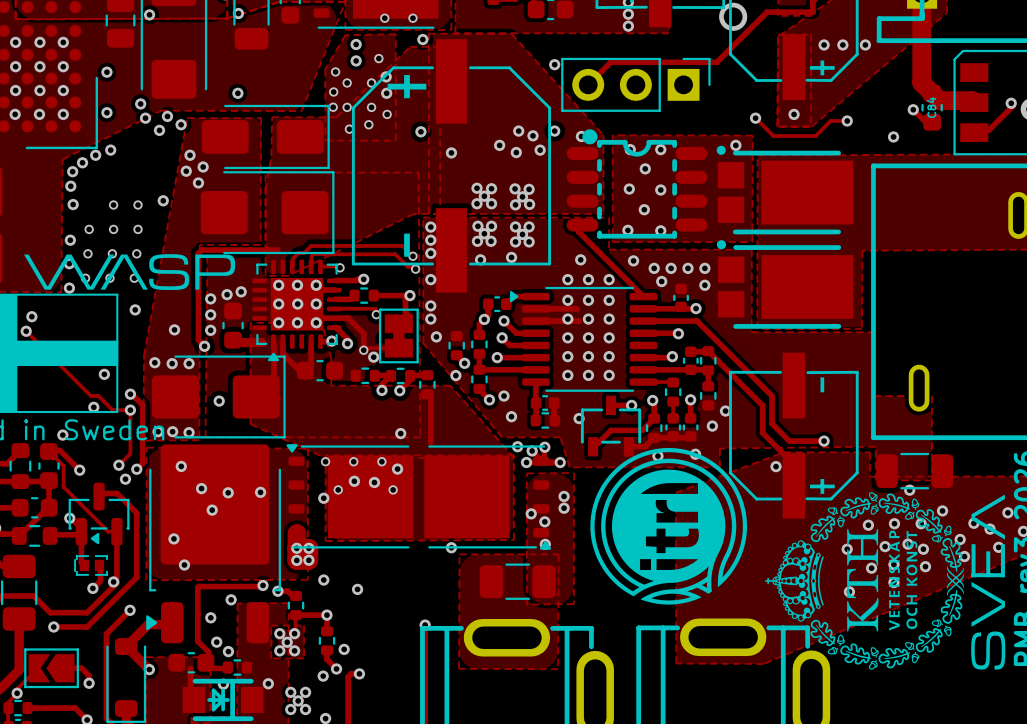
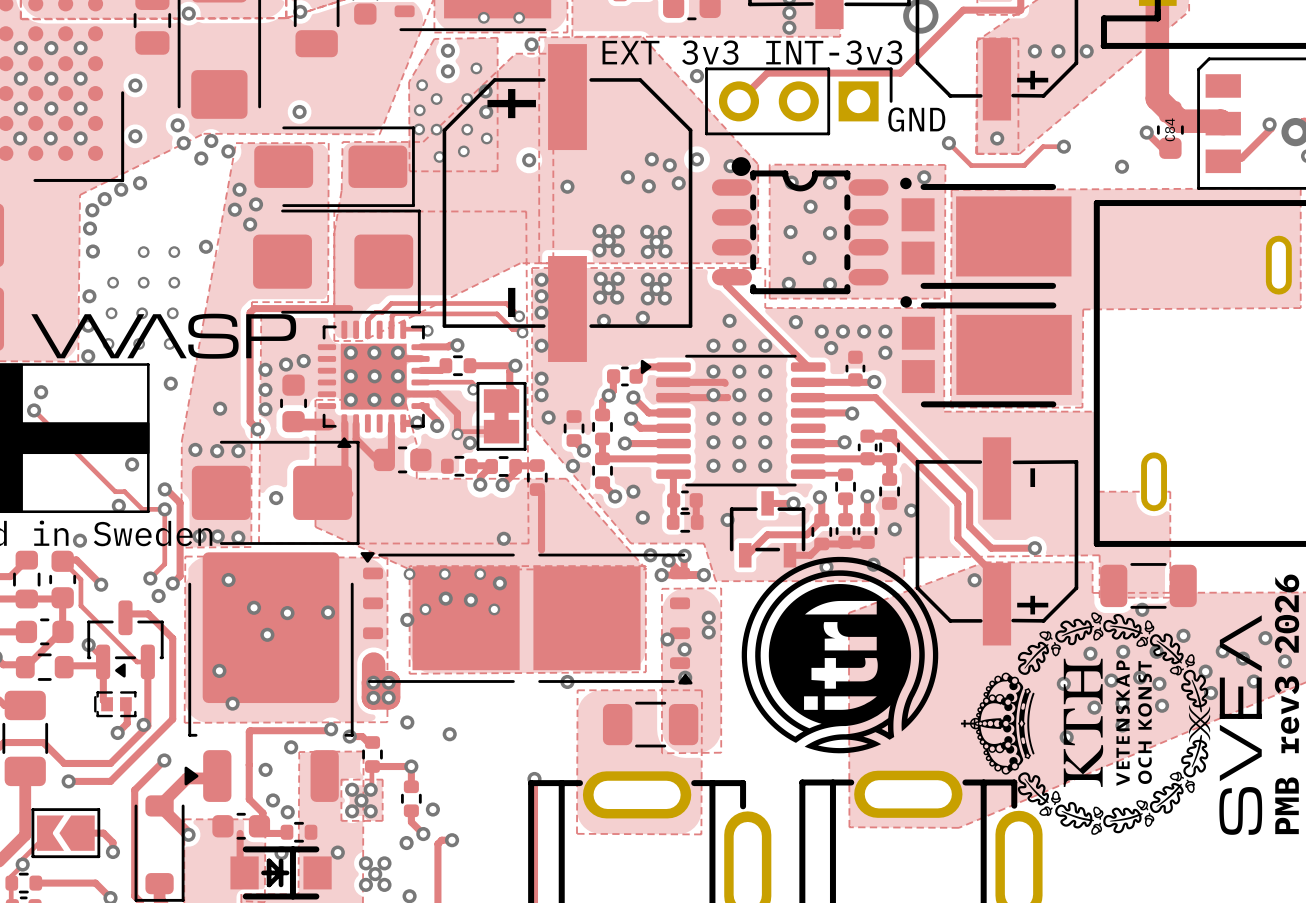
part text: none -> EXT 3v3 (670, 52)
part text: none -> INT-3v3 (834, 52)
part text: none -> GND (916, 119)

